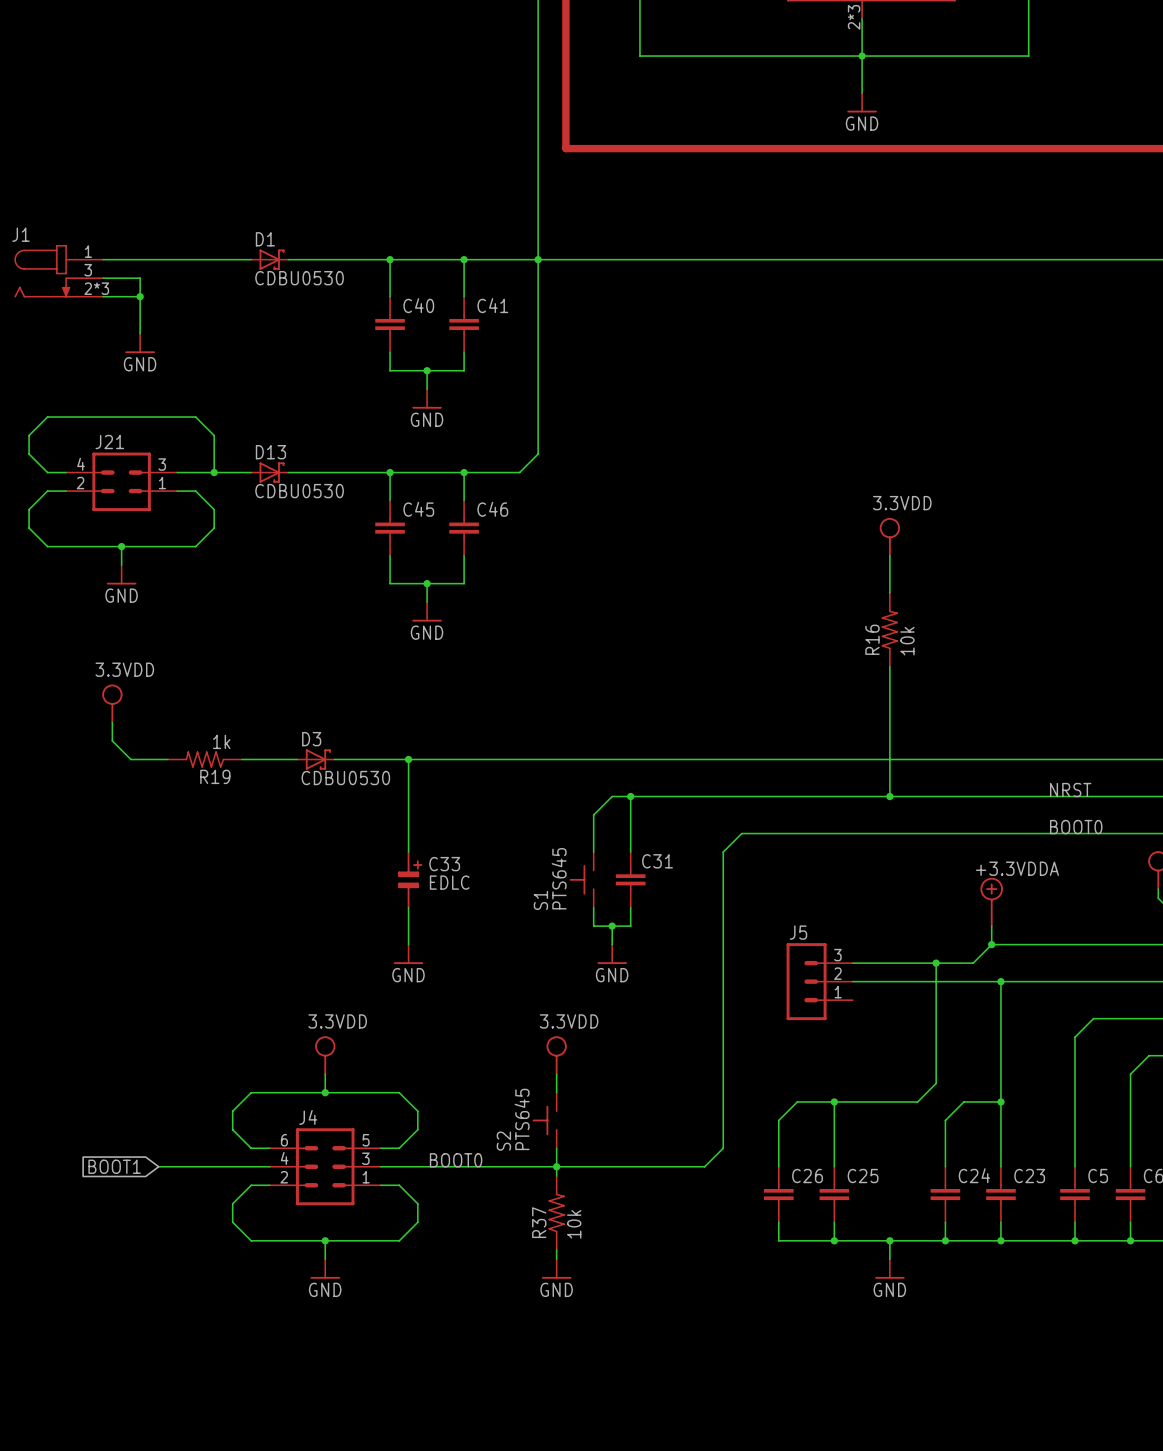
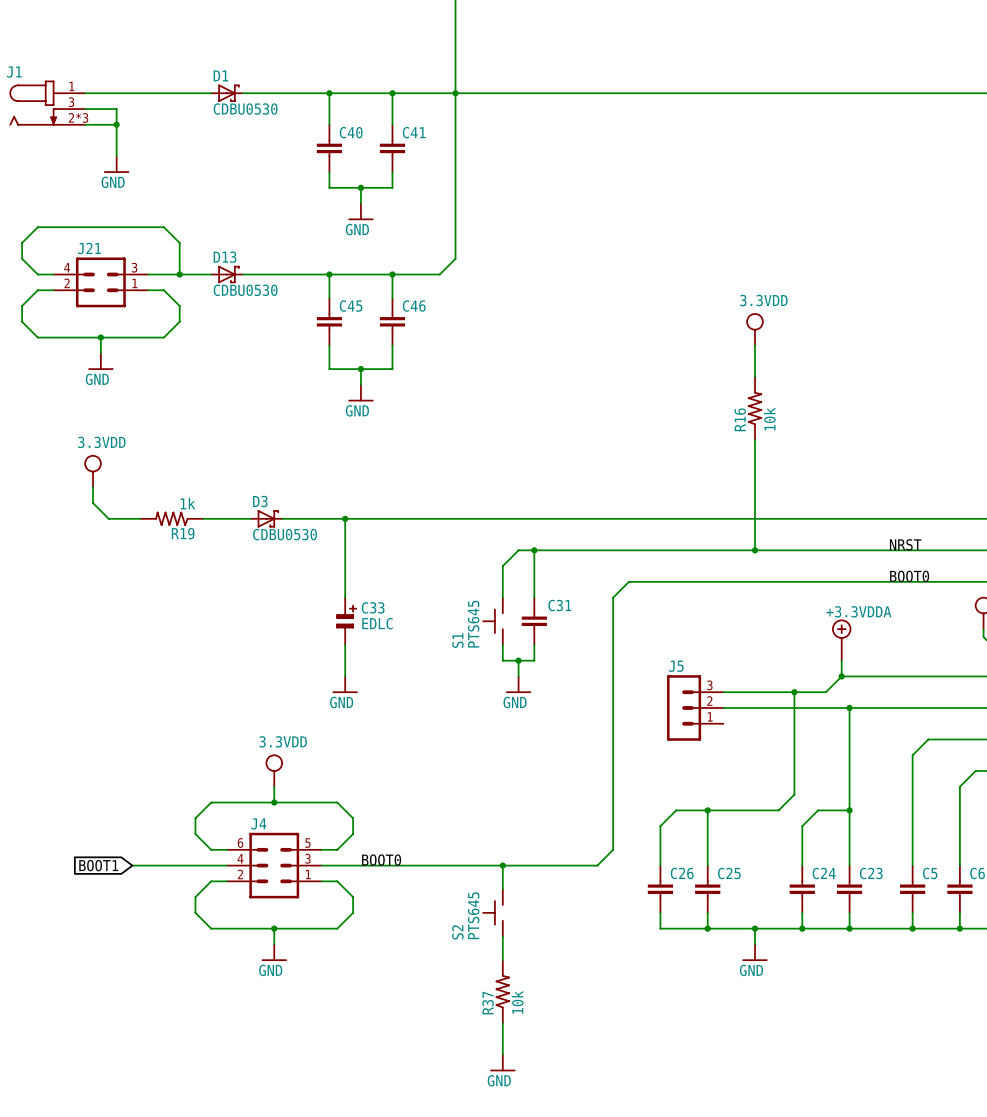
power symbol: 3.3VDD (556, 1055) -> none
wire: (556, 1074) (556, 1092) -> none
S2 position: (544, 1120) -> (492, 912)
wire: (556, 1148) (556, 1176) -> (502, 865) (502, 889)
junction position: (556, 1166) -> (502, 865)
R37 position: (556, 1213) -> (502, 991)
wire: (556, 1250) (556, 1259) -> none
wire: none -> (502, 936) (502, 960)
power symbol position: GND (556, 1269) -> GND (502, 1063)
wire: none -> (502, 1023) (502, 1054)

